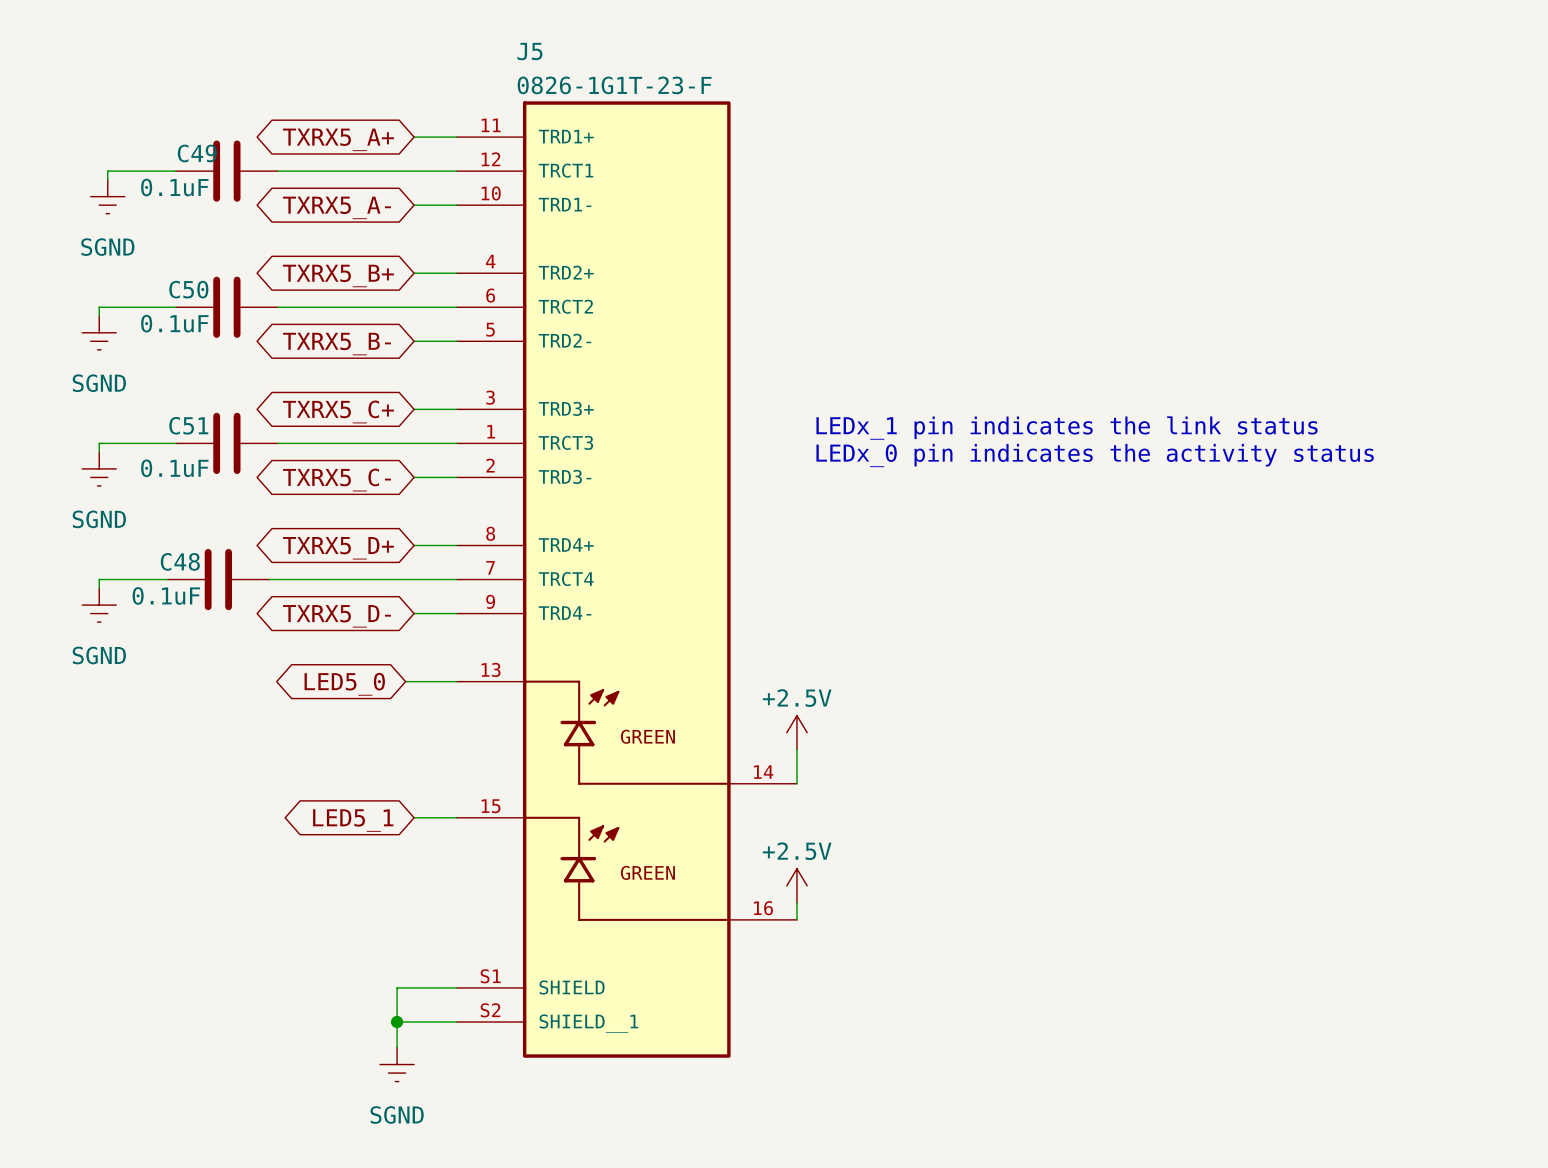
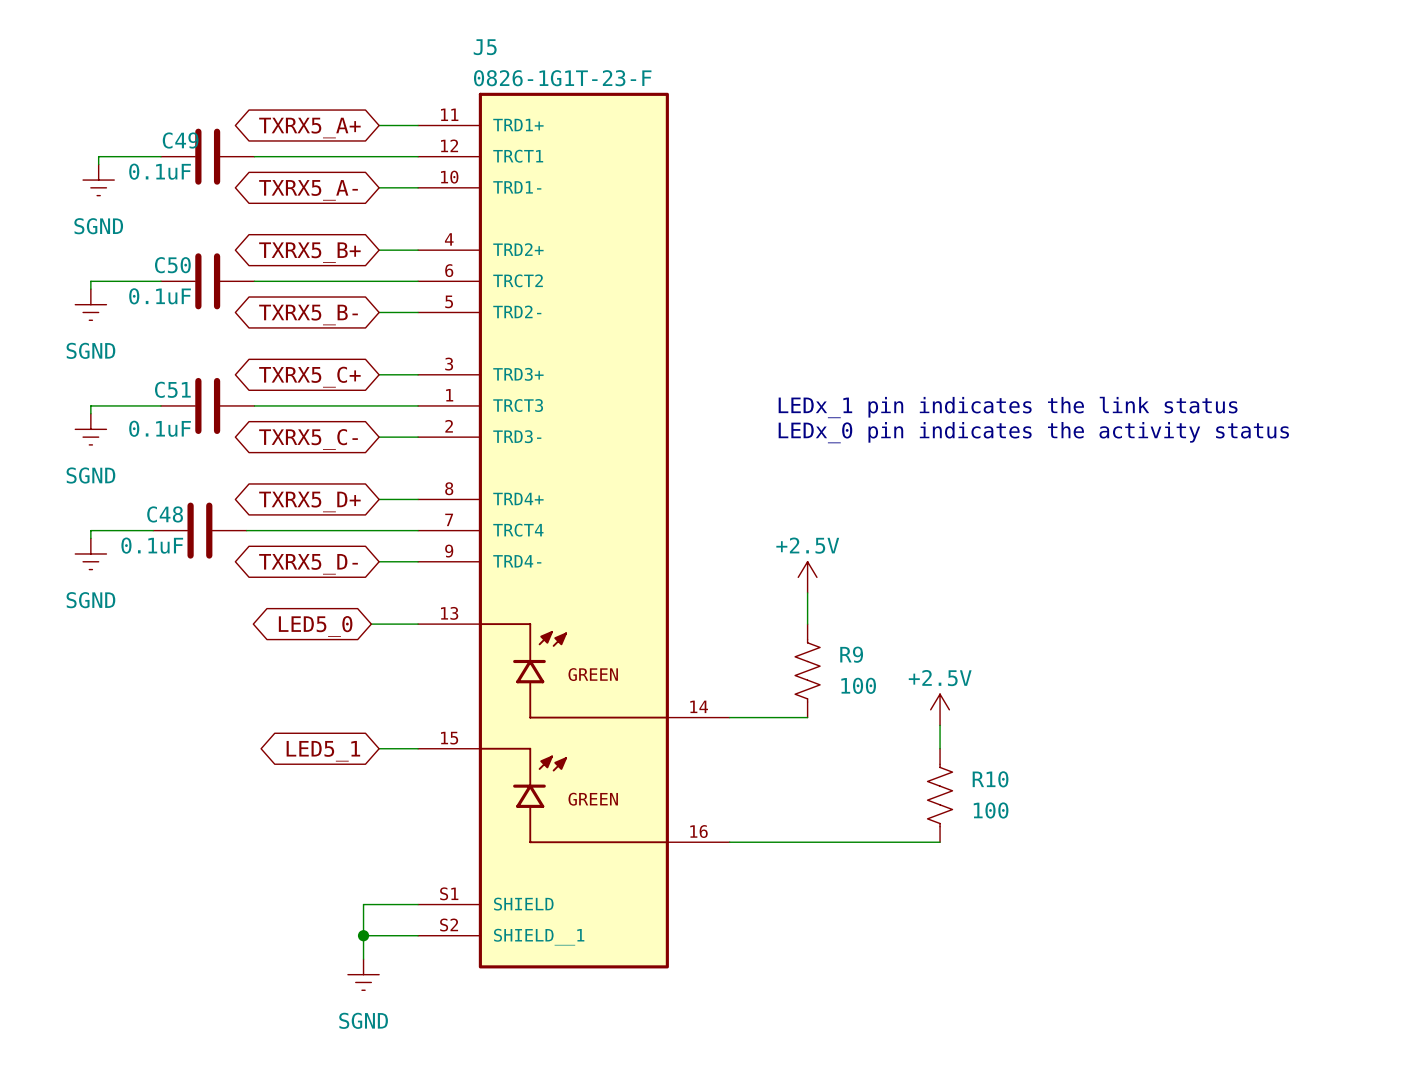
text position: LEDx_1 pin indicates the link status (1067, 428) -> LEDx_1 pin indicates the link status (1008, 407)
text position: LEDx_0 pin indicates the activity status (1095, 455) -> LEDx_0 pin indicates the activity status (1033, 432)
power symbol: none -> +2.5V (807, 577)
wire: none -> (807, 592) (807, 624)
power symbol: +2.5V (796, 732) -> none
R9: none -> 100 (807, 670)
wire: (796, 749) (796, 783) -> (807, 717) (729, 717)
power symbol: none -> +2.5V (940, 709)
wire: none -> (940, 725) (940, 748)
R10: none -> 100 (940, 795)
power symbol: +2.5V (796, 885) -> none
wire: (796, 902) (796, 919) -> (940, 842) (729, 842)

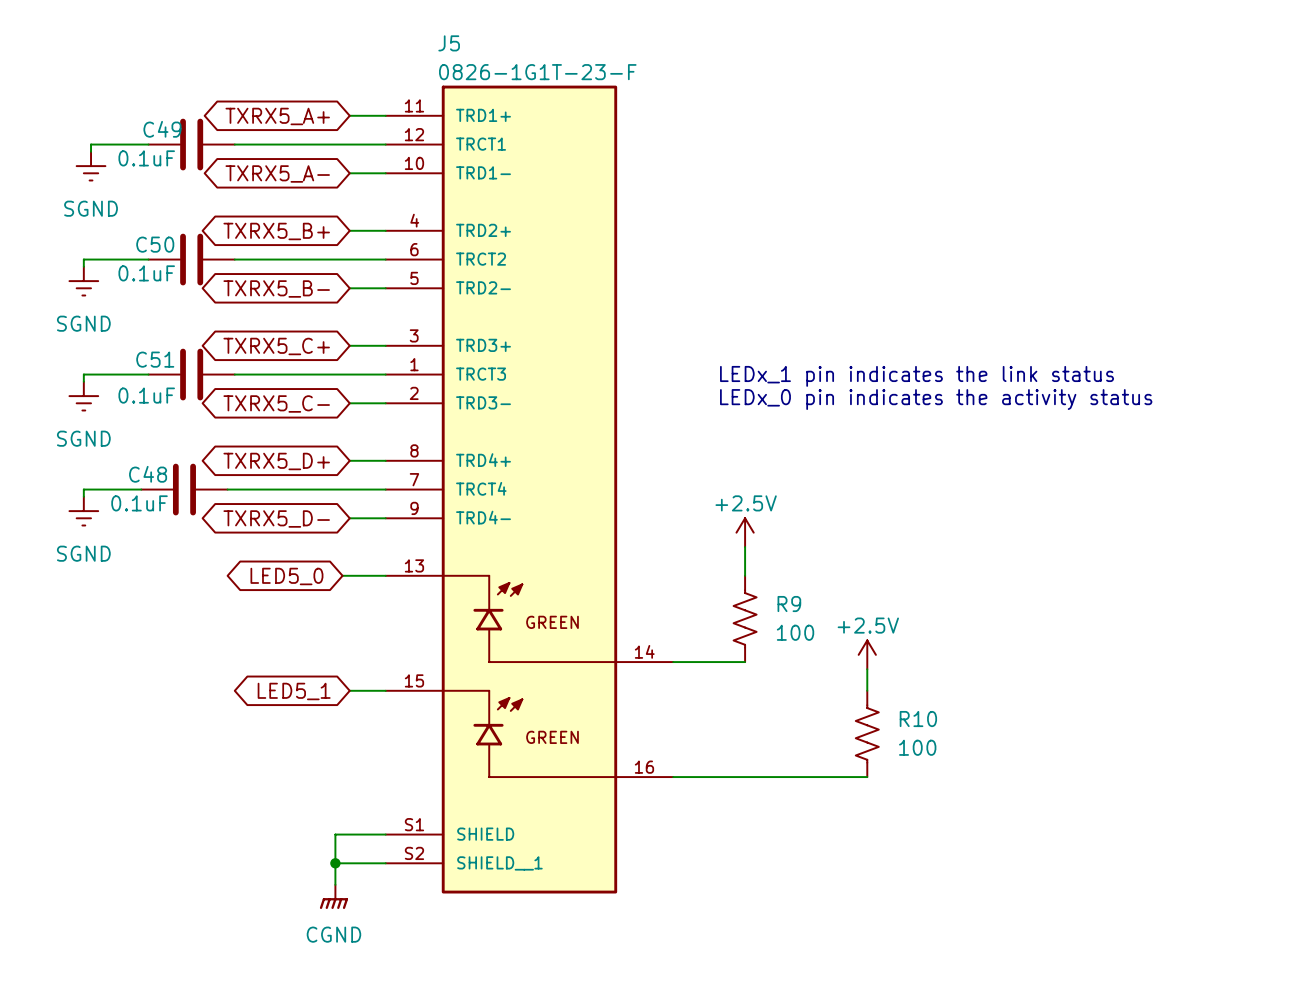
power symbol: SGND (363, 974) -> CGND (333, 896)

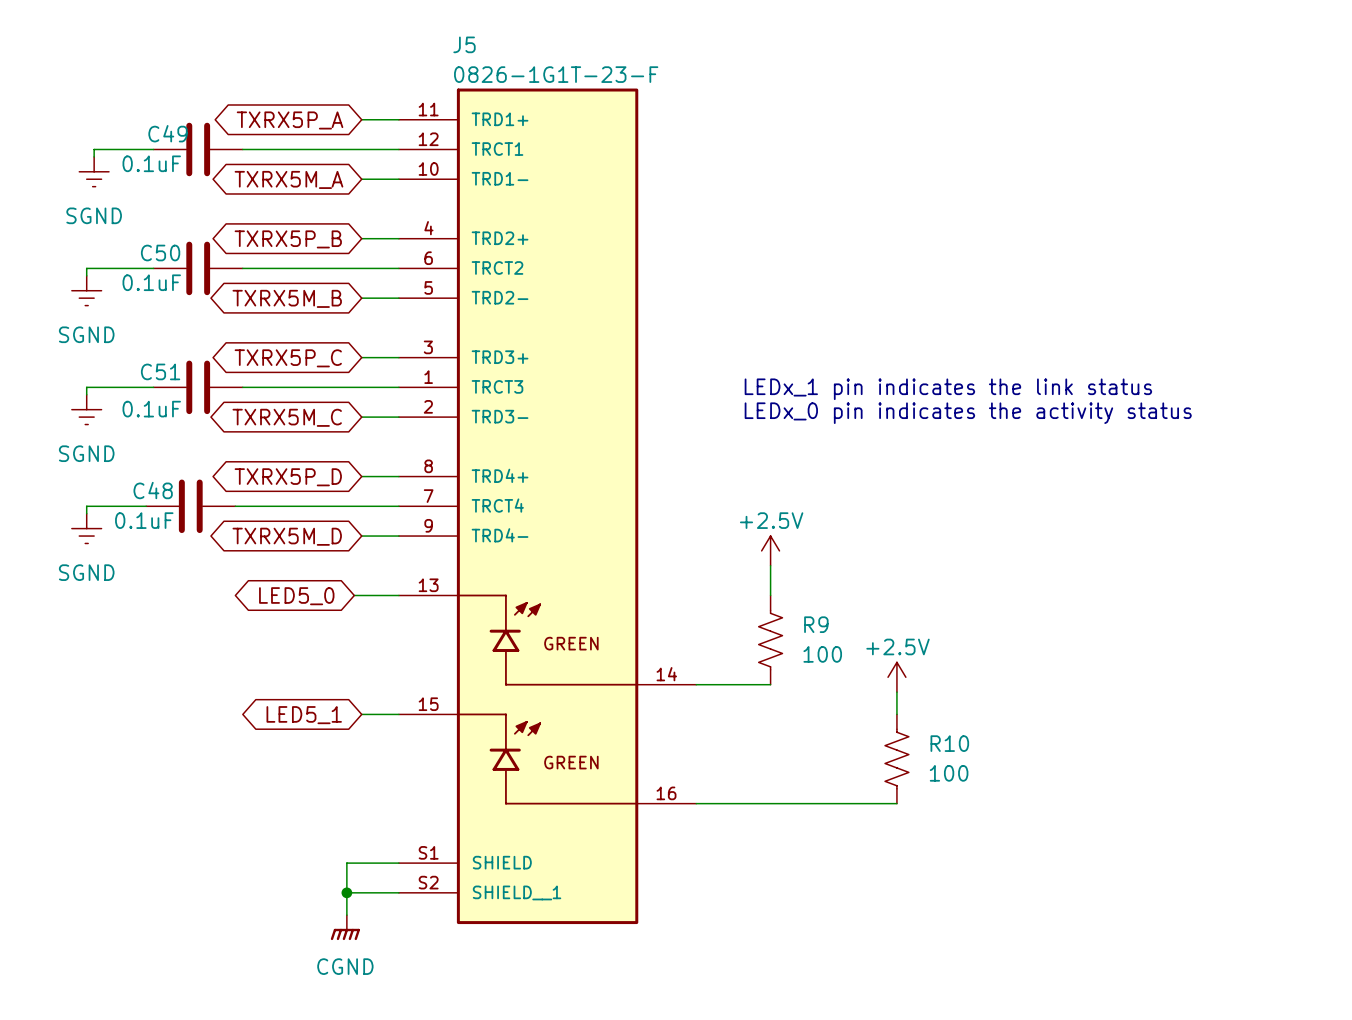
global label: TXRX5_A+ (277, 116) -> TXRX5P_A (290, 120)
global label: TXRX5_A- (277, 173) -> TXRX5M_A (288, 179)
global label: TXRX5_B+ (276, 231) -> TXRX5P_B (288, 239)
global label: TXRX5_B- (276, 288) -> TXRX5M_B (287, 298)
global label: TXRX5_C+ (276, 346) -> TXRX5P_C (288, 358)
global label: TXRX5_C- (276, 403) -> TXRX5M_C (287, 417)
global label: TXRX5_D+ (276, 461) -> TXRX5P_D (288, 477)
global label: TXRX5_D- (276, 518) -> TXRX5M_D (287, 536)

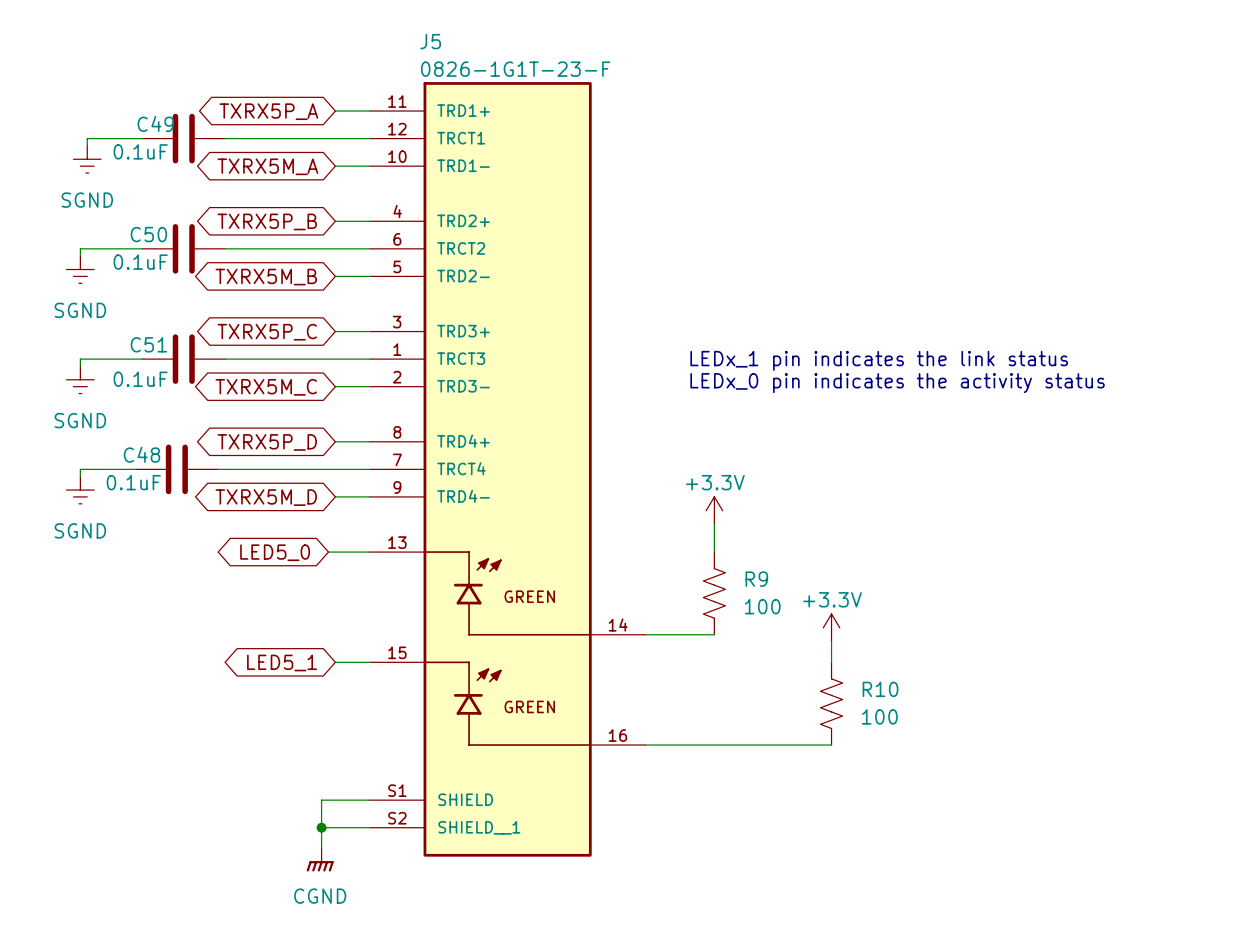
power symbol: +2.5V (770, 550) -> +3.3V (714, 510)
power symbol: +2.5V (896, 677) -> +3.3V (831, 627)

